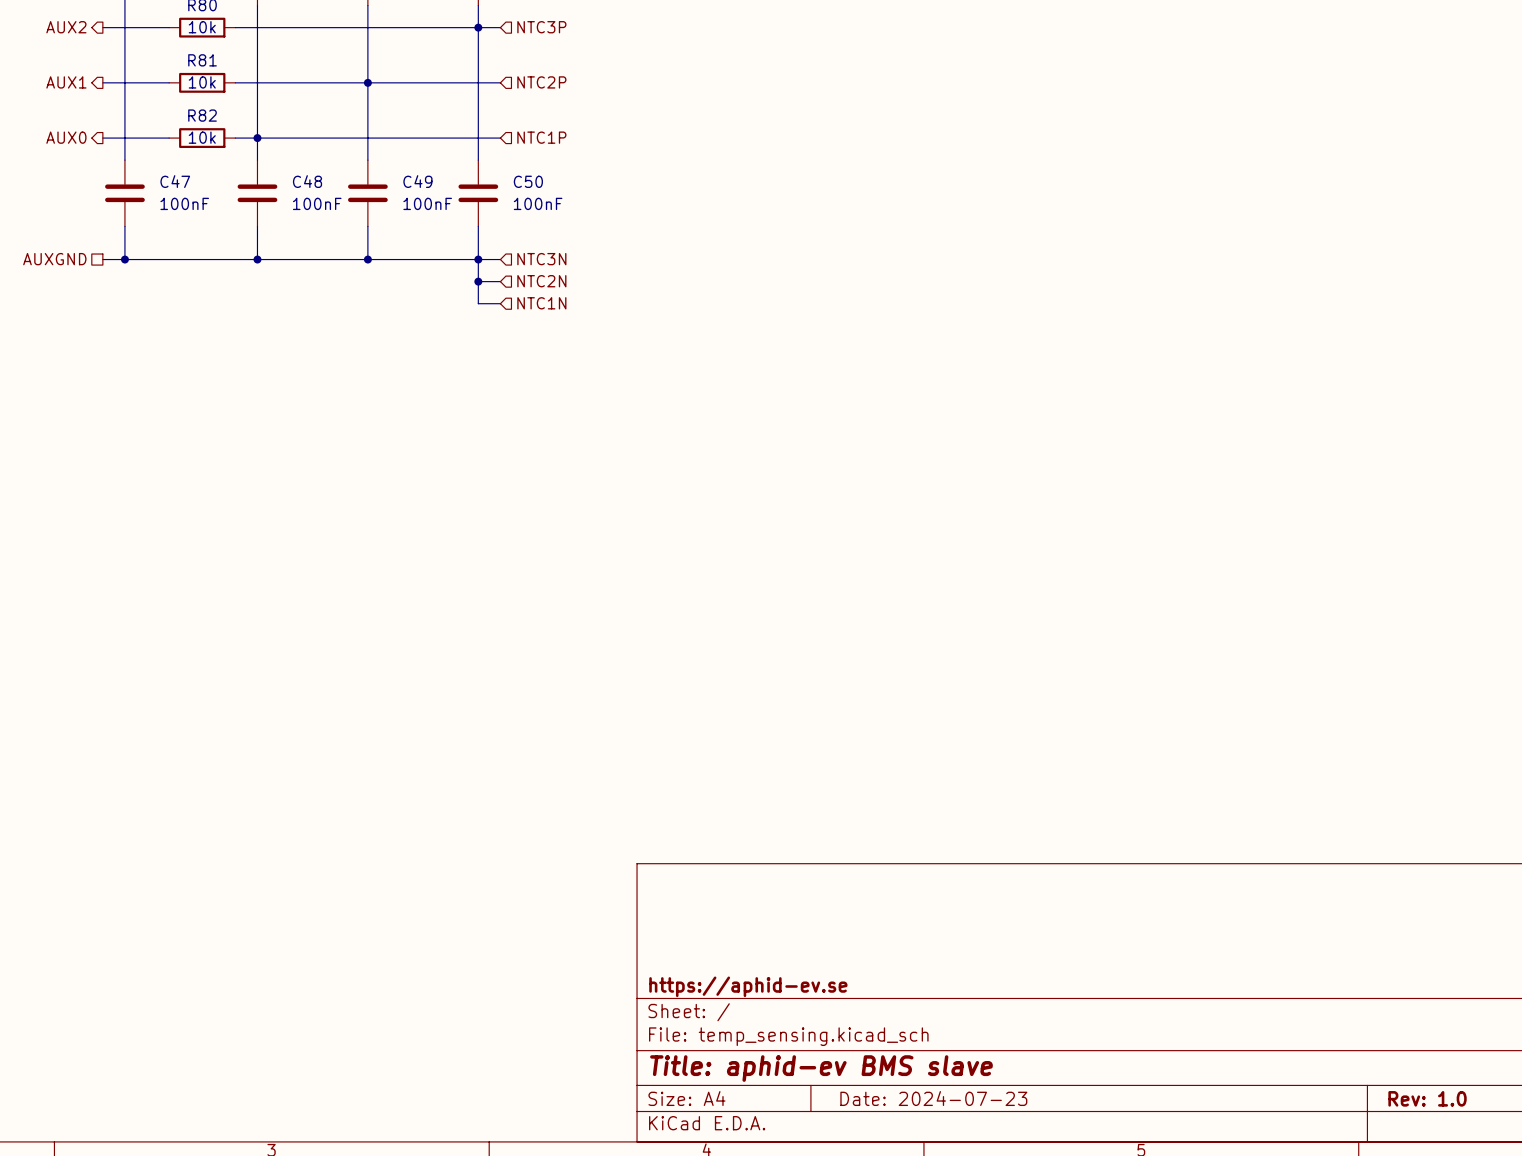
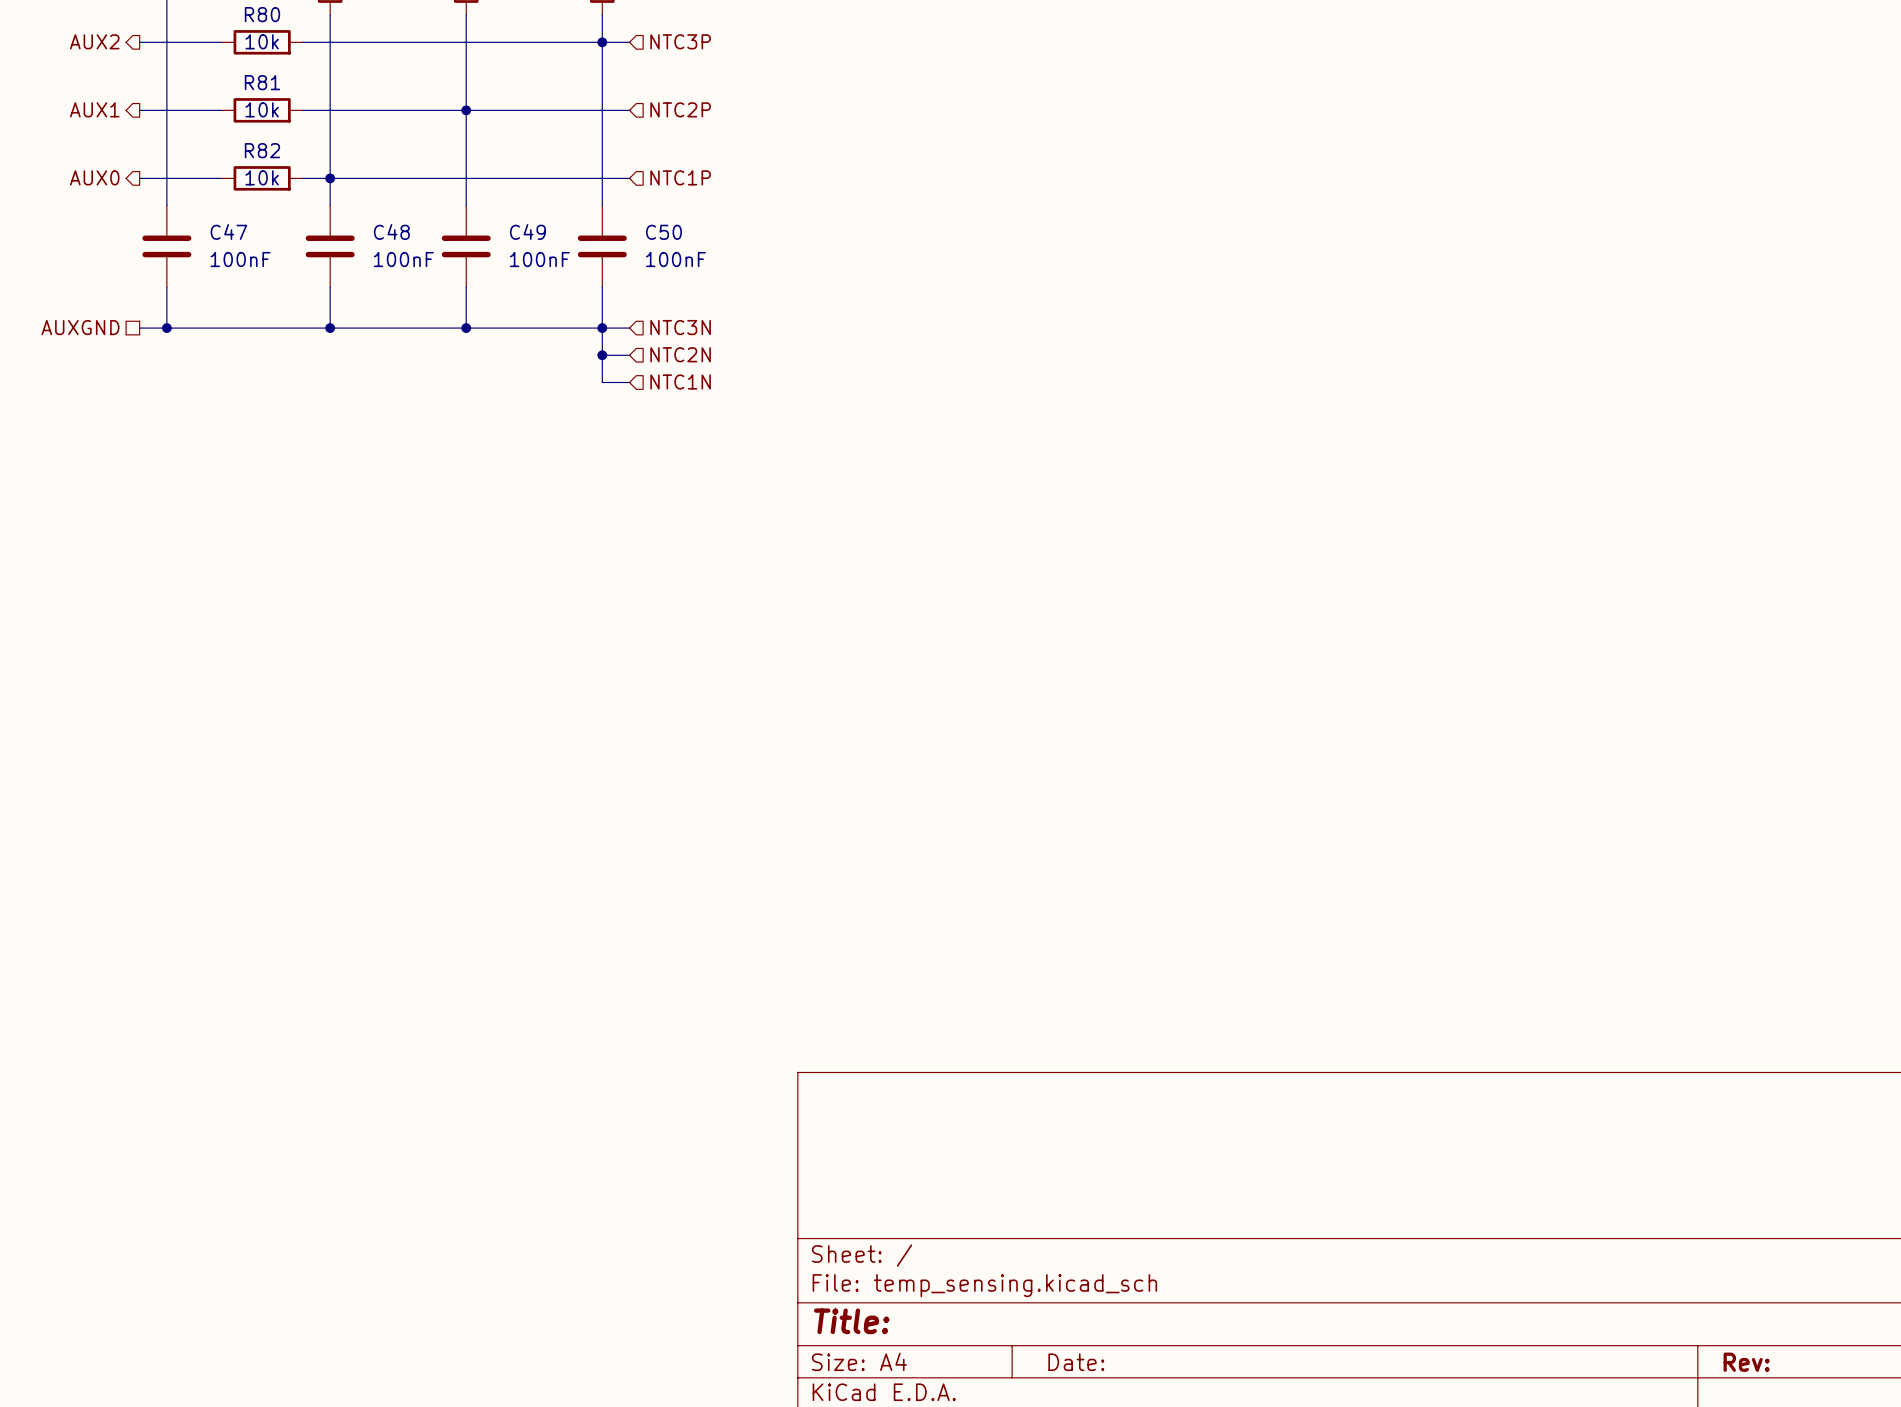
title block: https://aphid-ev.se (748, 986) -> none
title block: Title: aphid-ev BMS slave (821, 1068) -> Title: (851, 1321)
title block: Date: 2024-07-23 (933, 1098) -> Date: (1076, 1362)
title block: Rev: 1.0 (1427, 1098) -> Rev: (1746, 1362)

